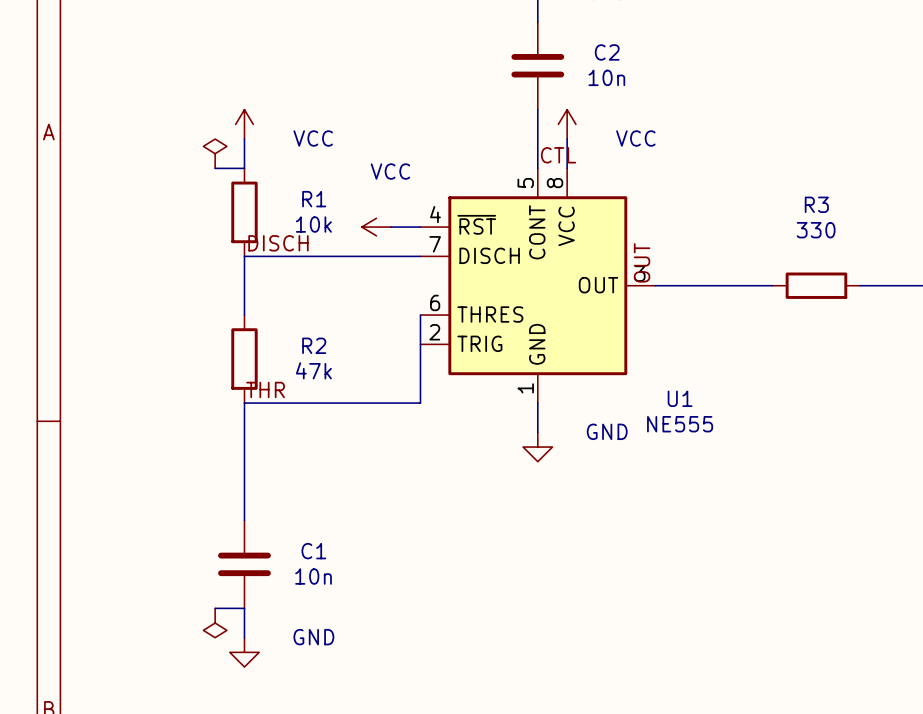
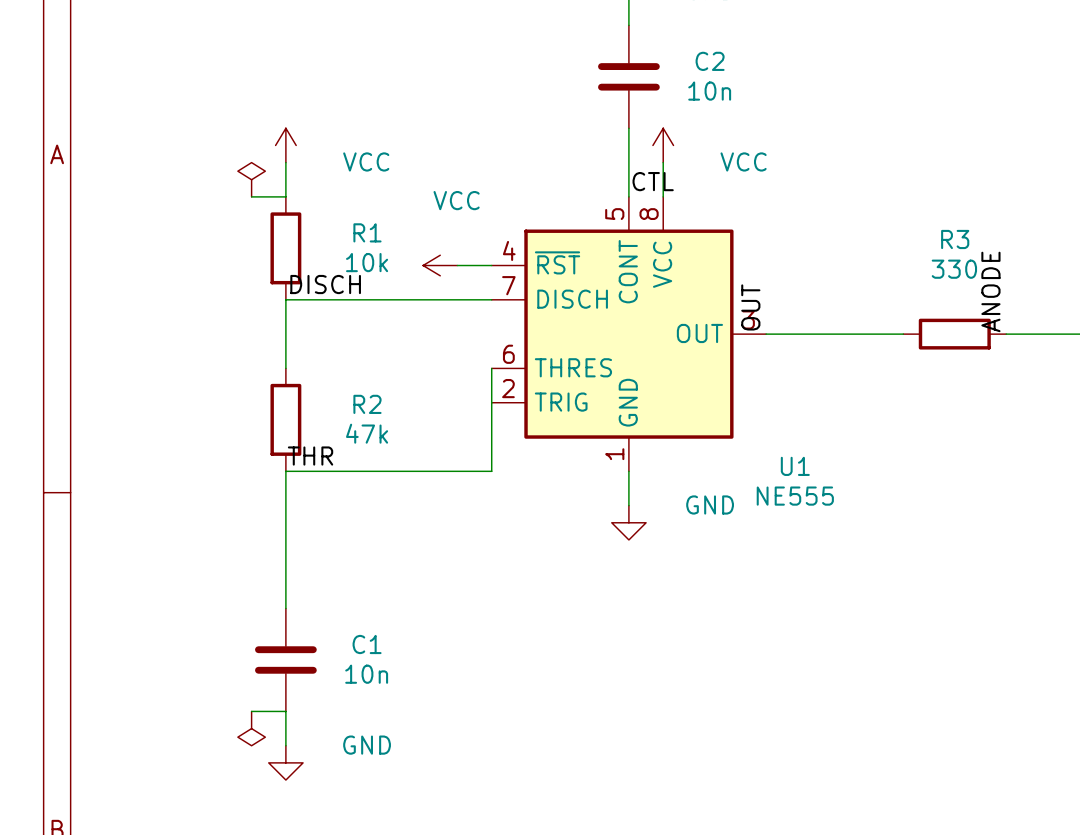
label: none -> ANODE (990, 291)

